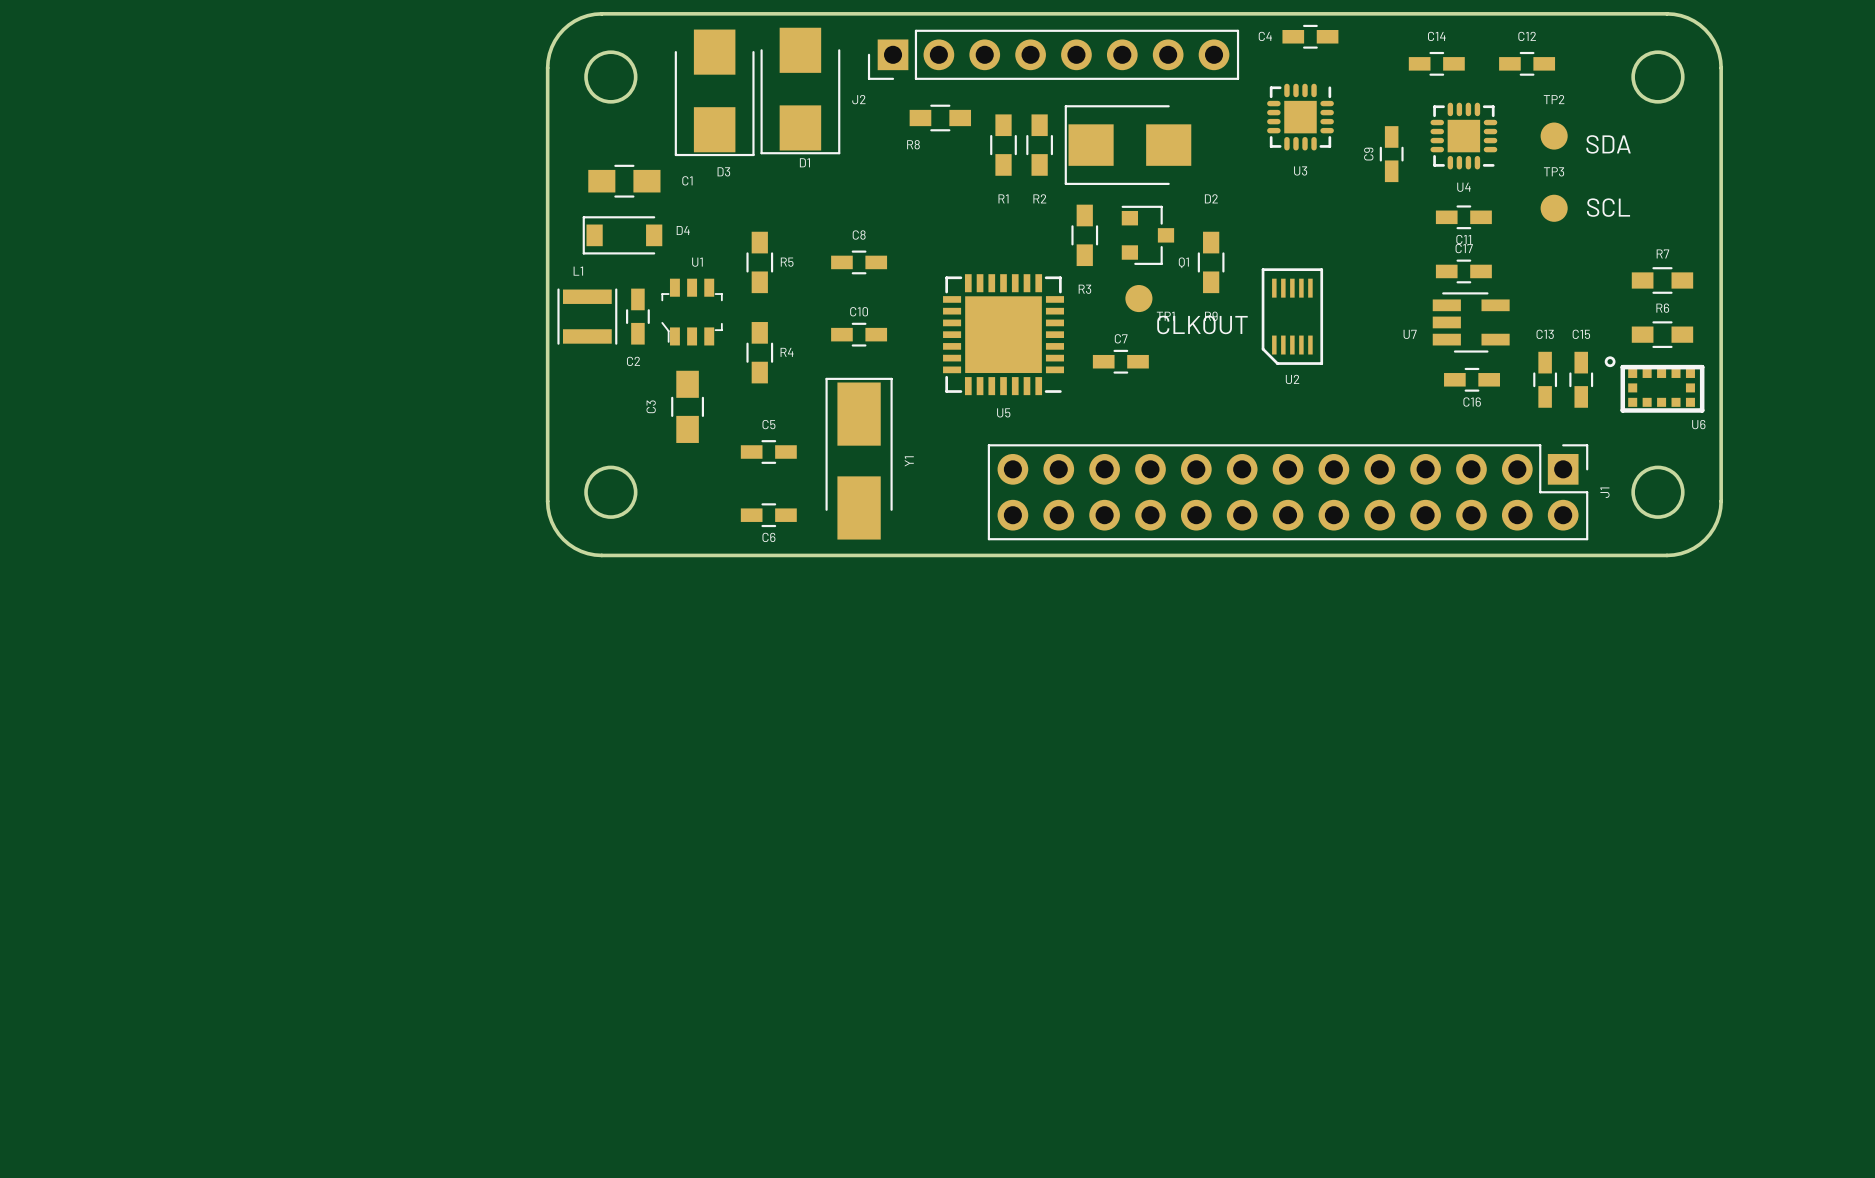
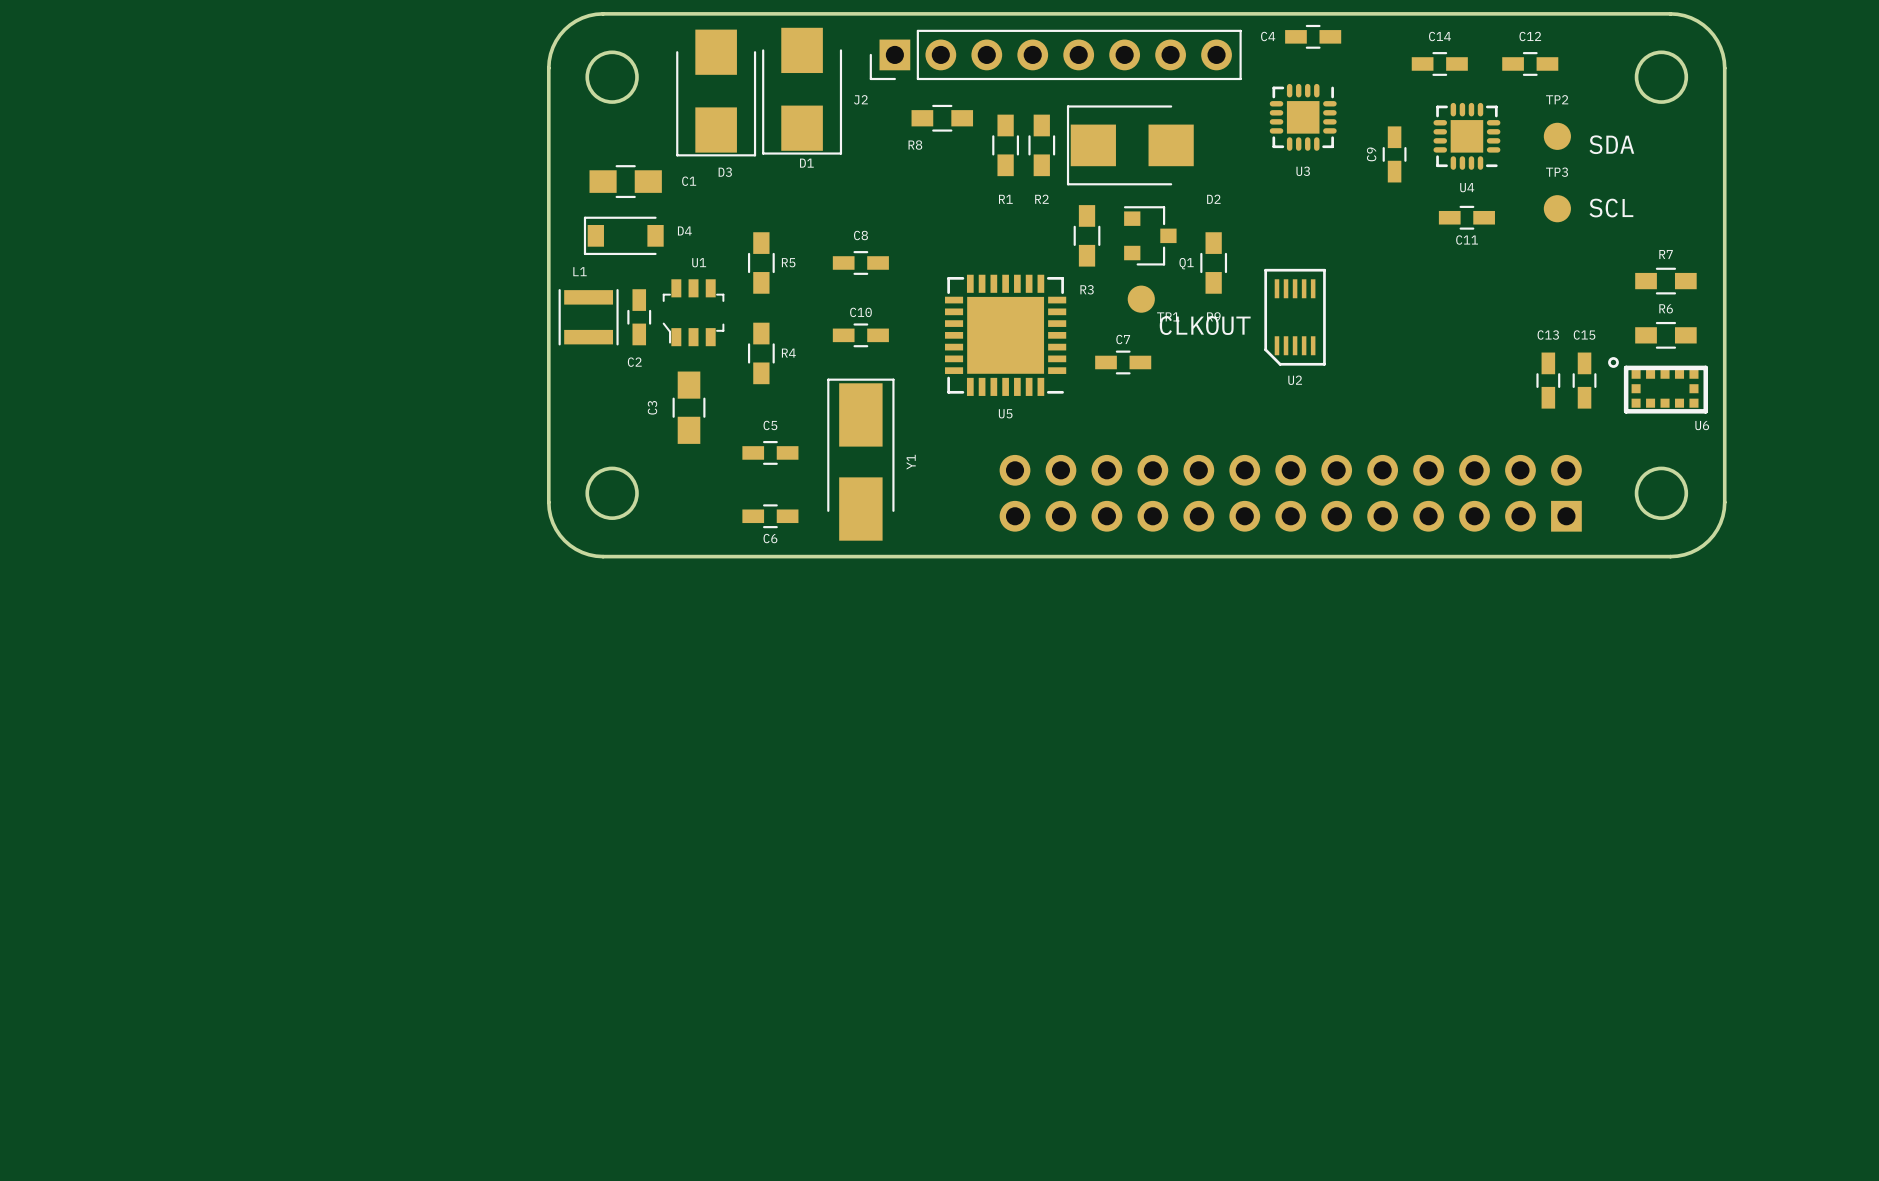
C17: (1463, 271) -> none
U7: (1471, 322) -> none
C16: (1472, 379) -> none
J1 side: top (1288, 492) -> bottom (1290, 493)

